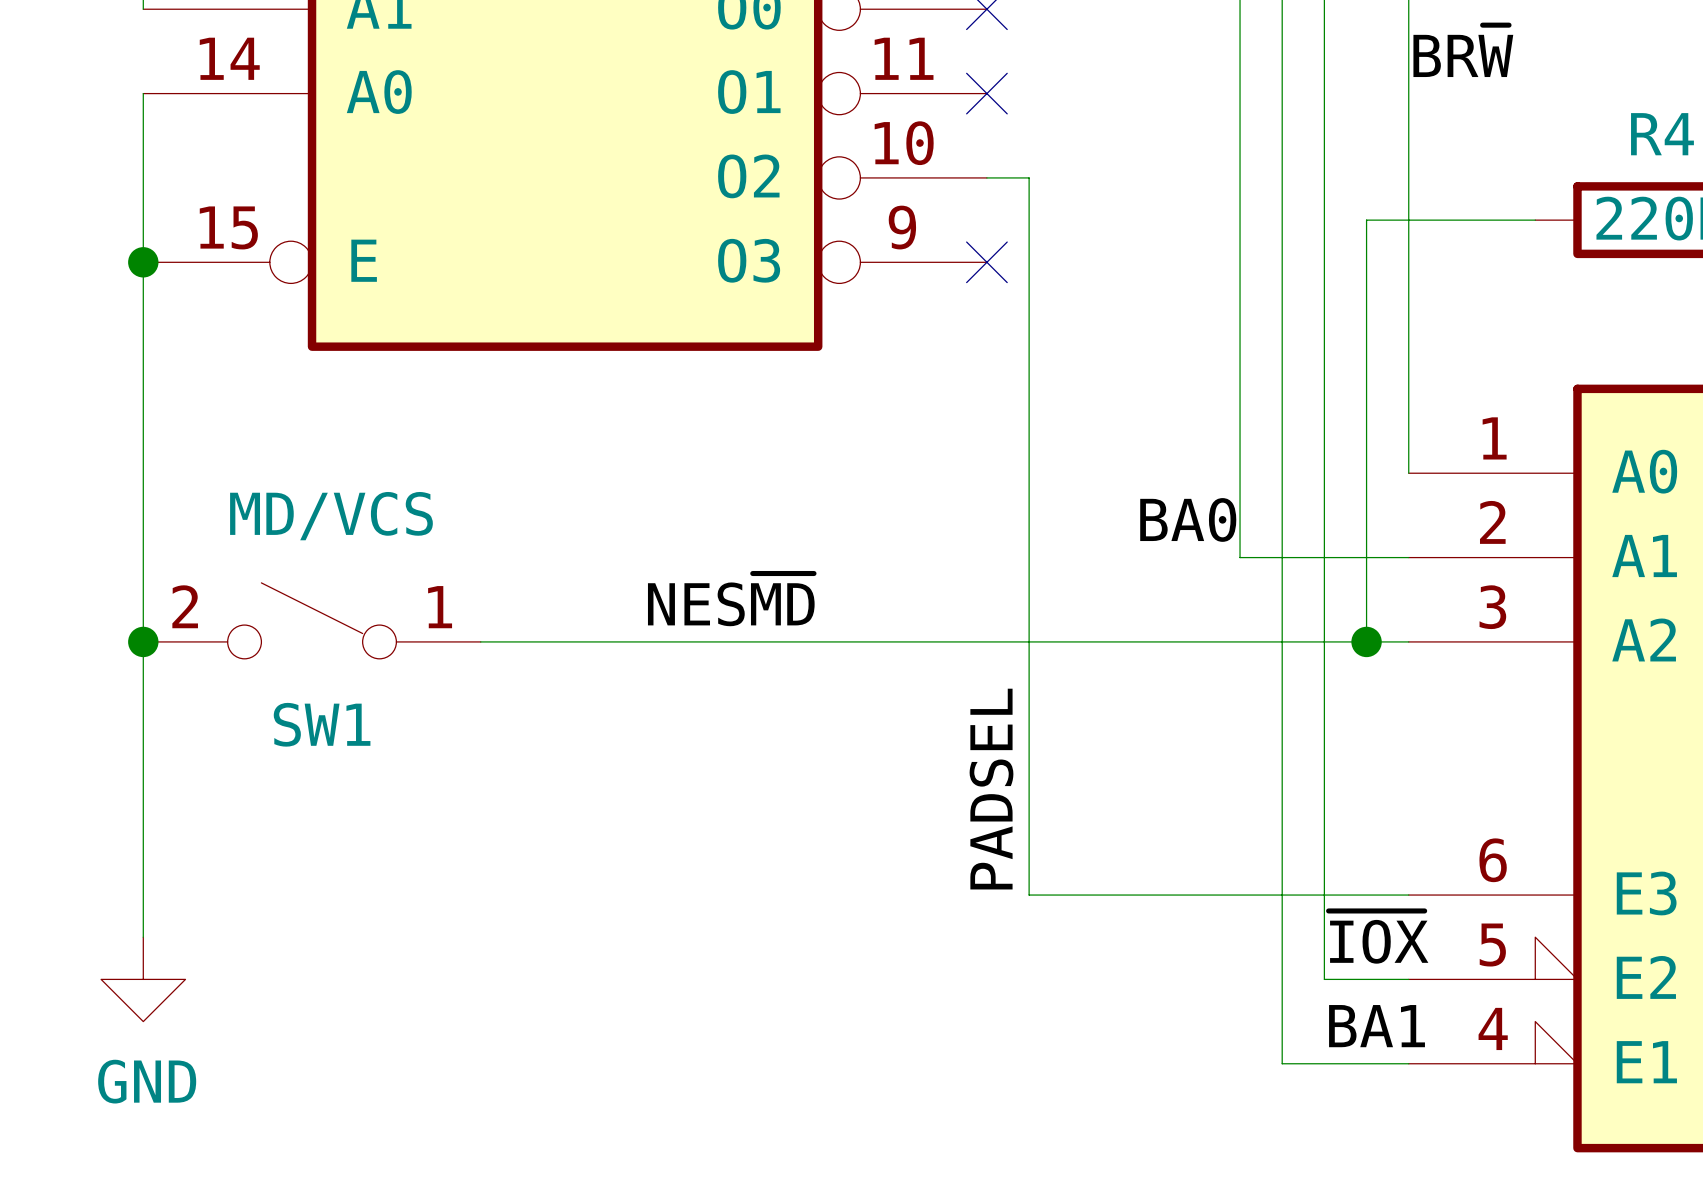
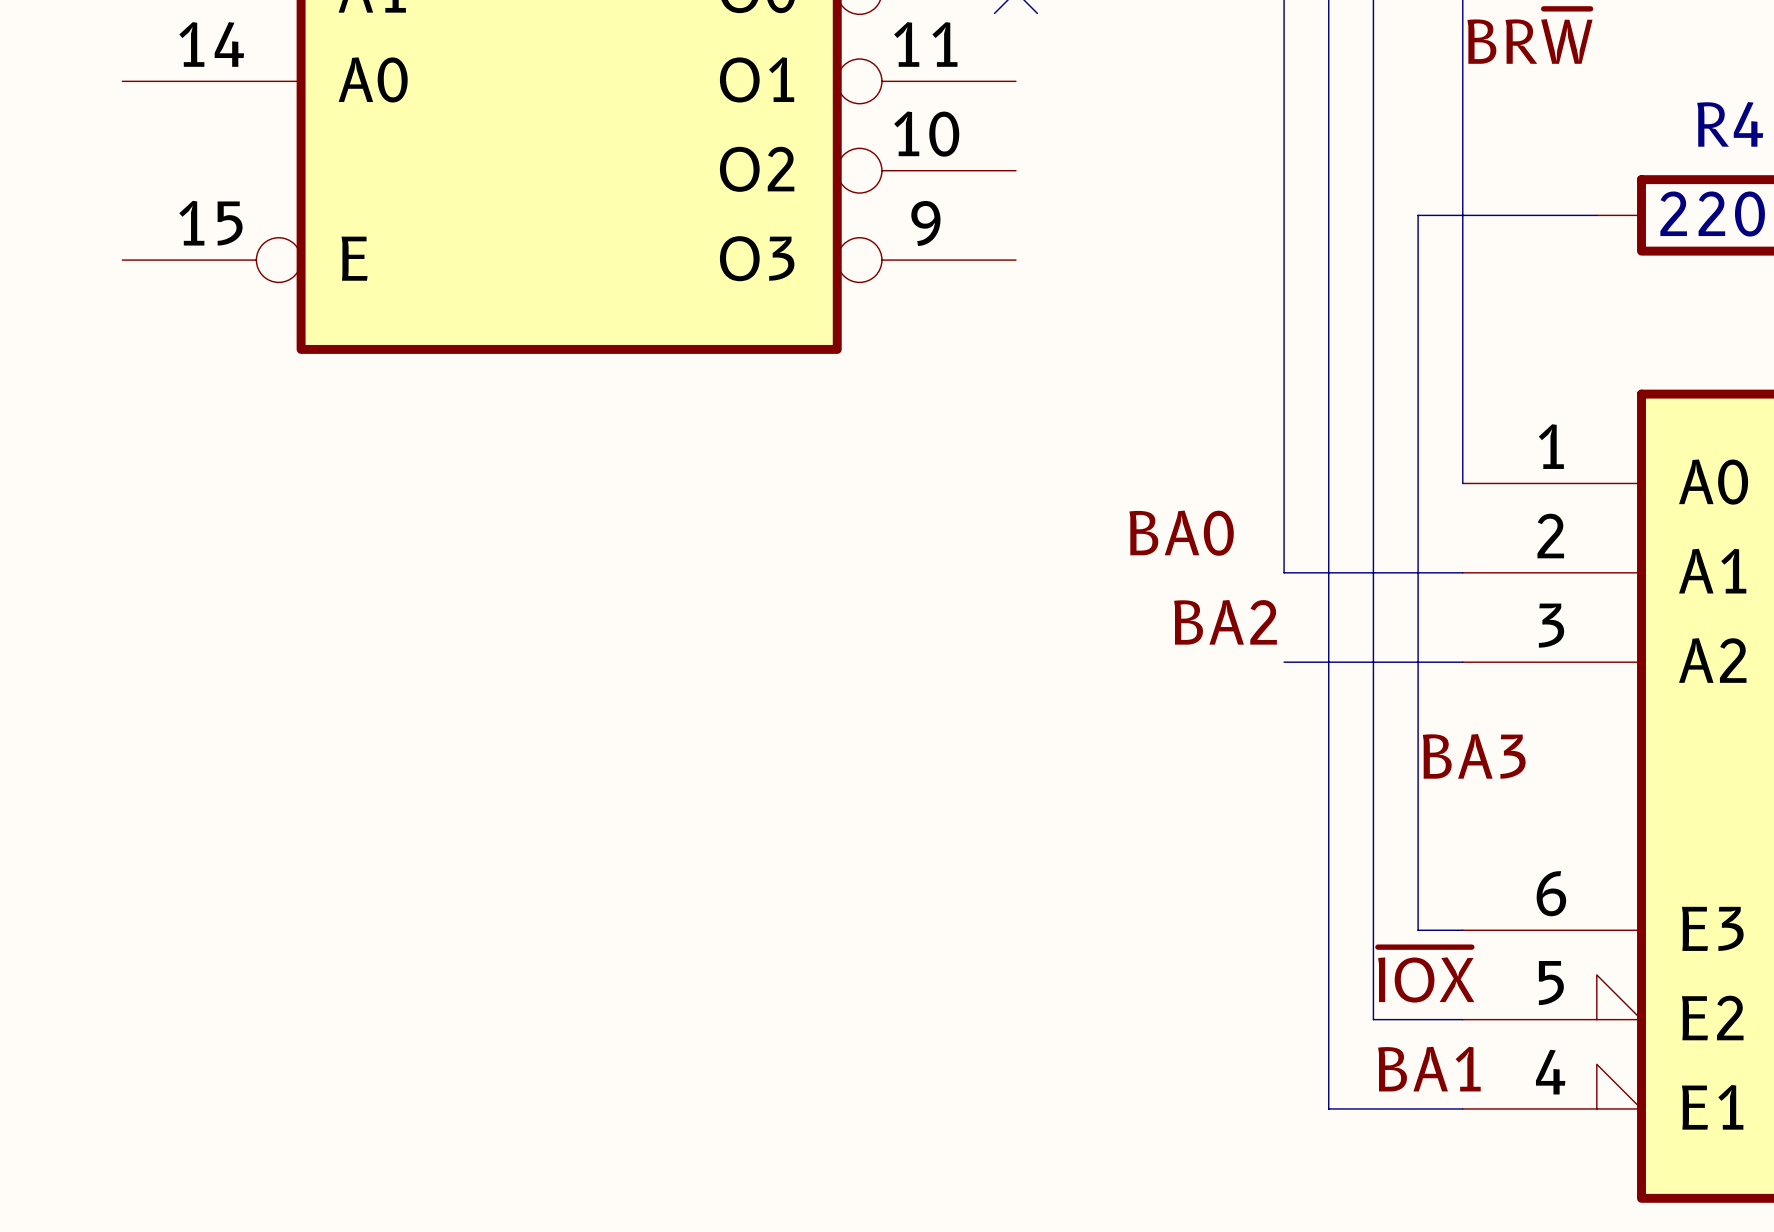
wire: (143, 93) (143, 937) -> none
no-connect mark: (986, 93) -> none
wire: (986, 177) (1029, 177) (1029, 895) (1366, 895) -> (1418, 662) (1418, 930)
junction: (143, 262) -> none
no-connect mark: (986, 262) -> none
label position: BA0 (1188, 519) -> BA0 (1181, 533)
label: NES~{MD} (731, 599) -> none
label: none -> BA2 (1225, 622)
SW1: MD/VCS (312, 620) -> none
junction: (143, 641) -> none
wire: (480, 641) (1240, 641) -> none
junction: (1366, 641) -> none
label: none -> BA3 (1474, 756)
label: PADSEL (991, 789) -> none
power symbol: GND (143, 979) -> none

